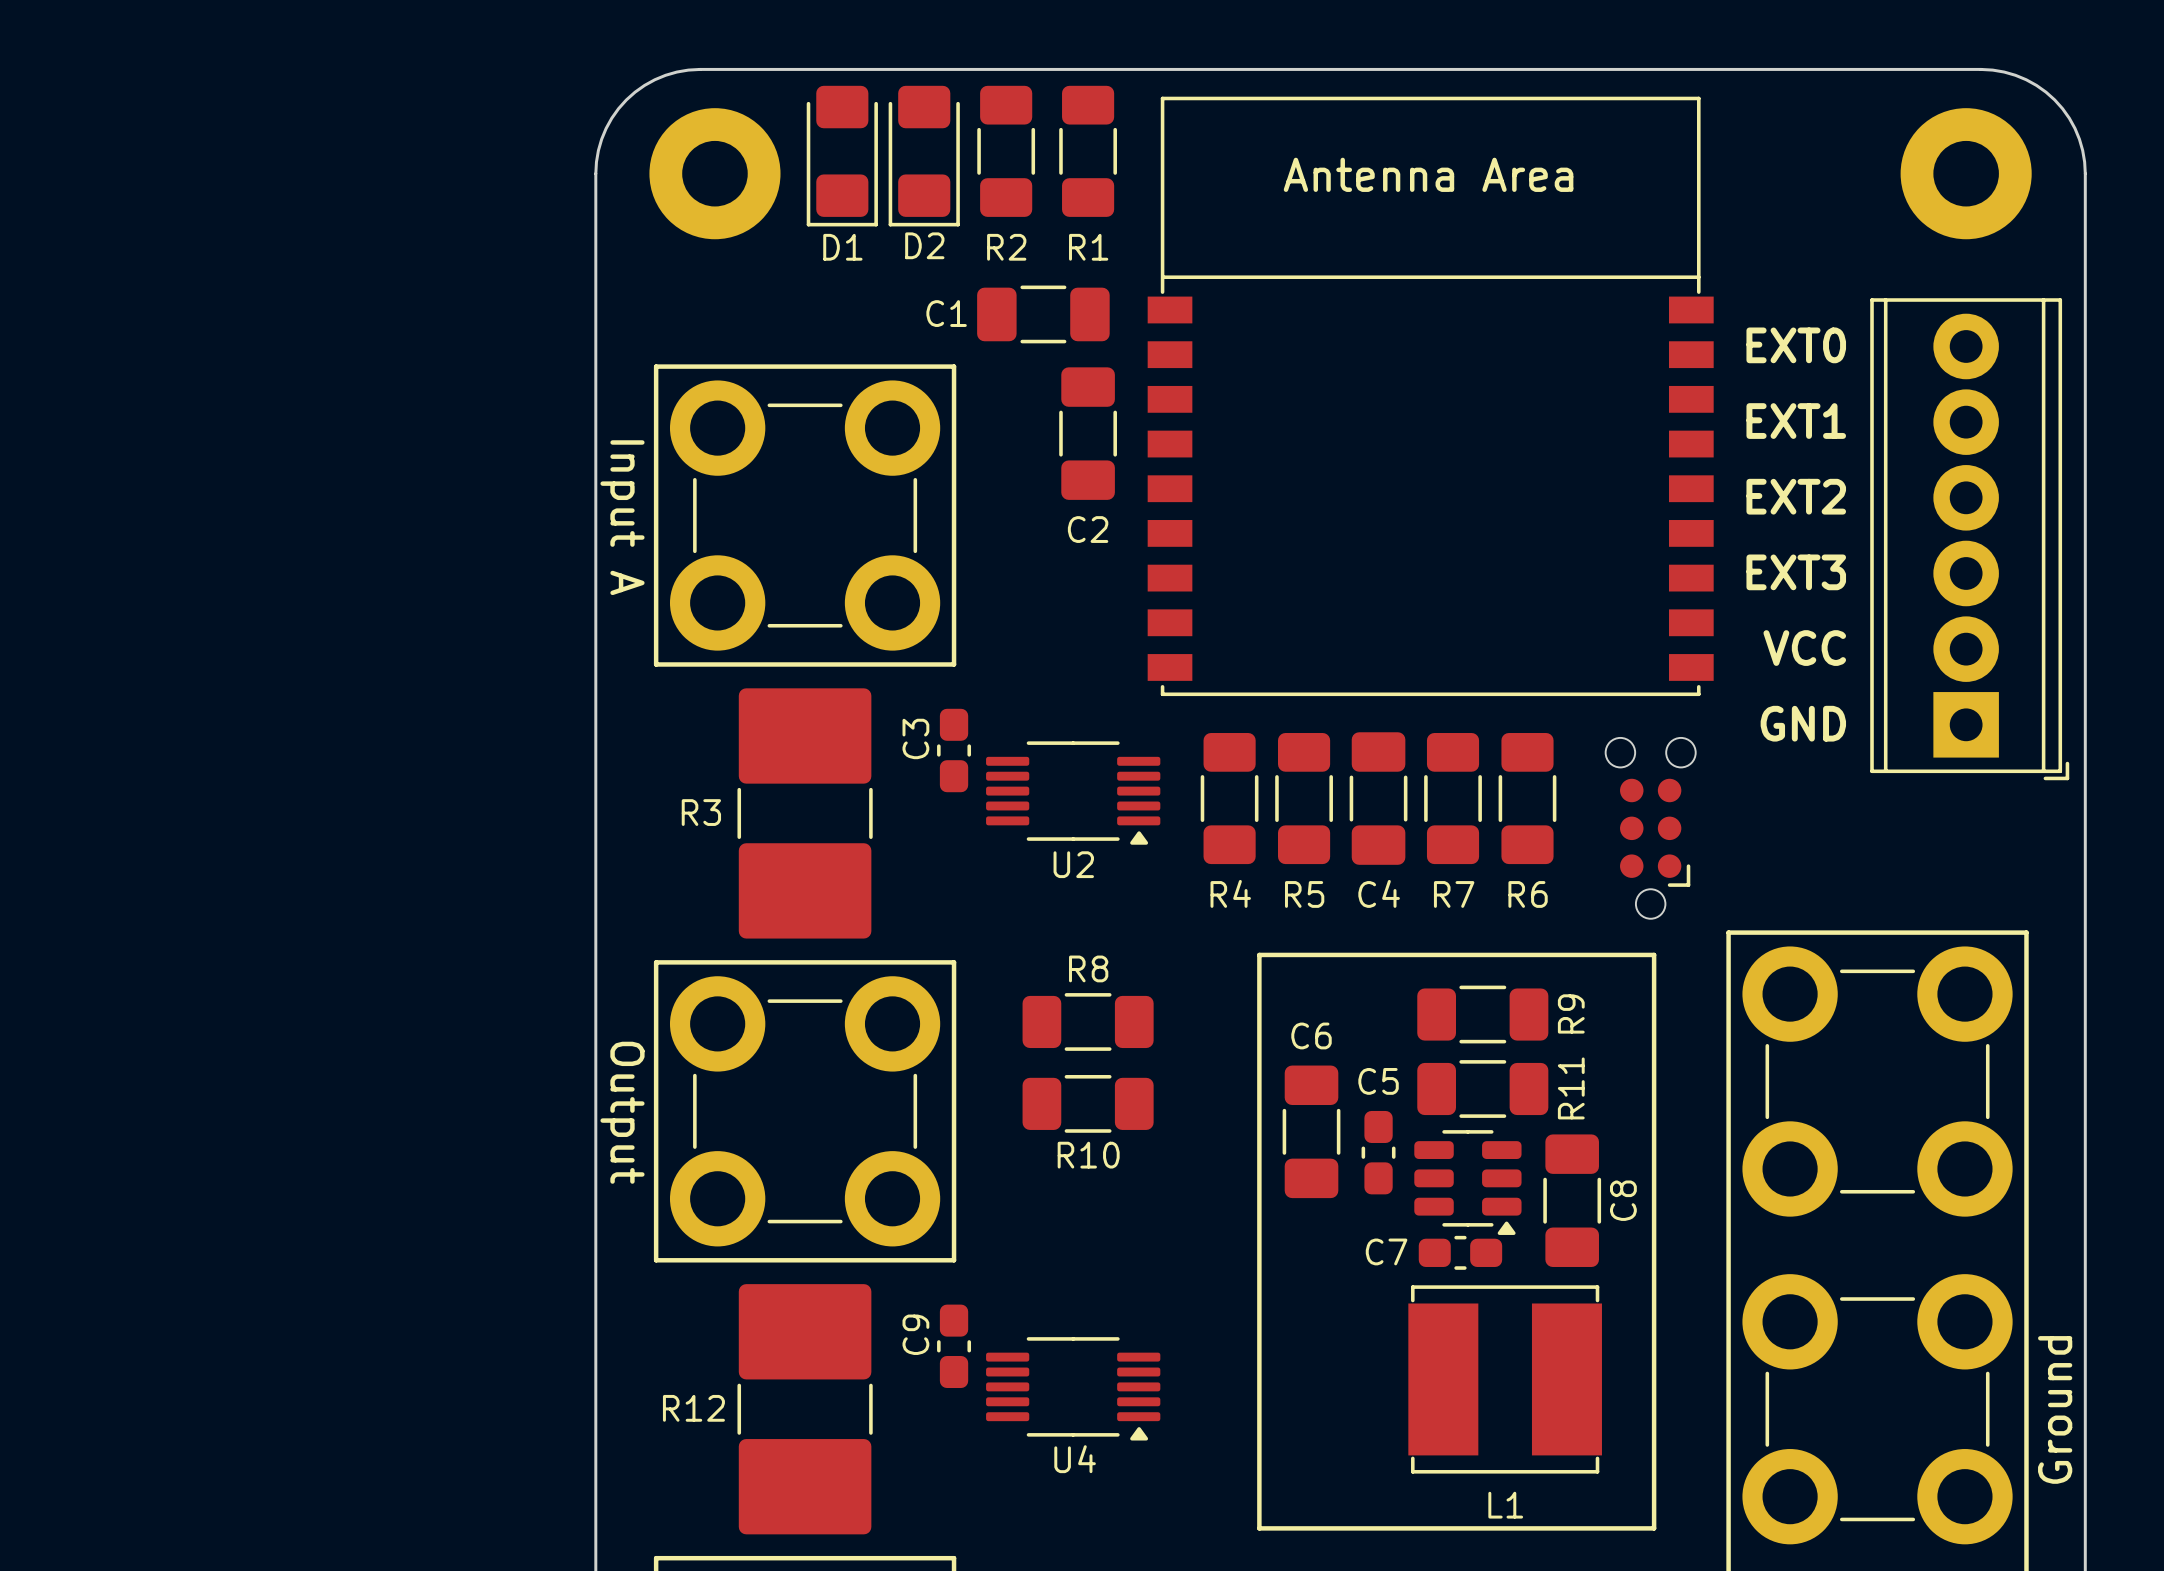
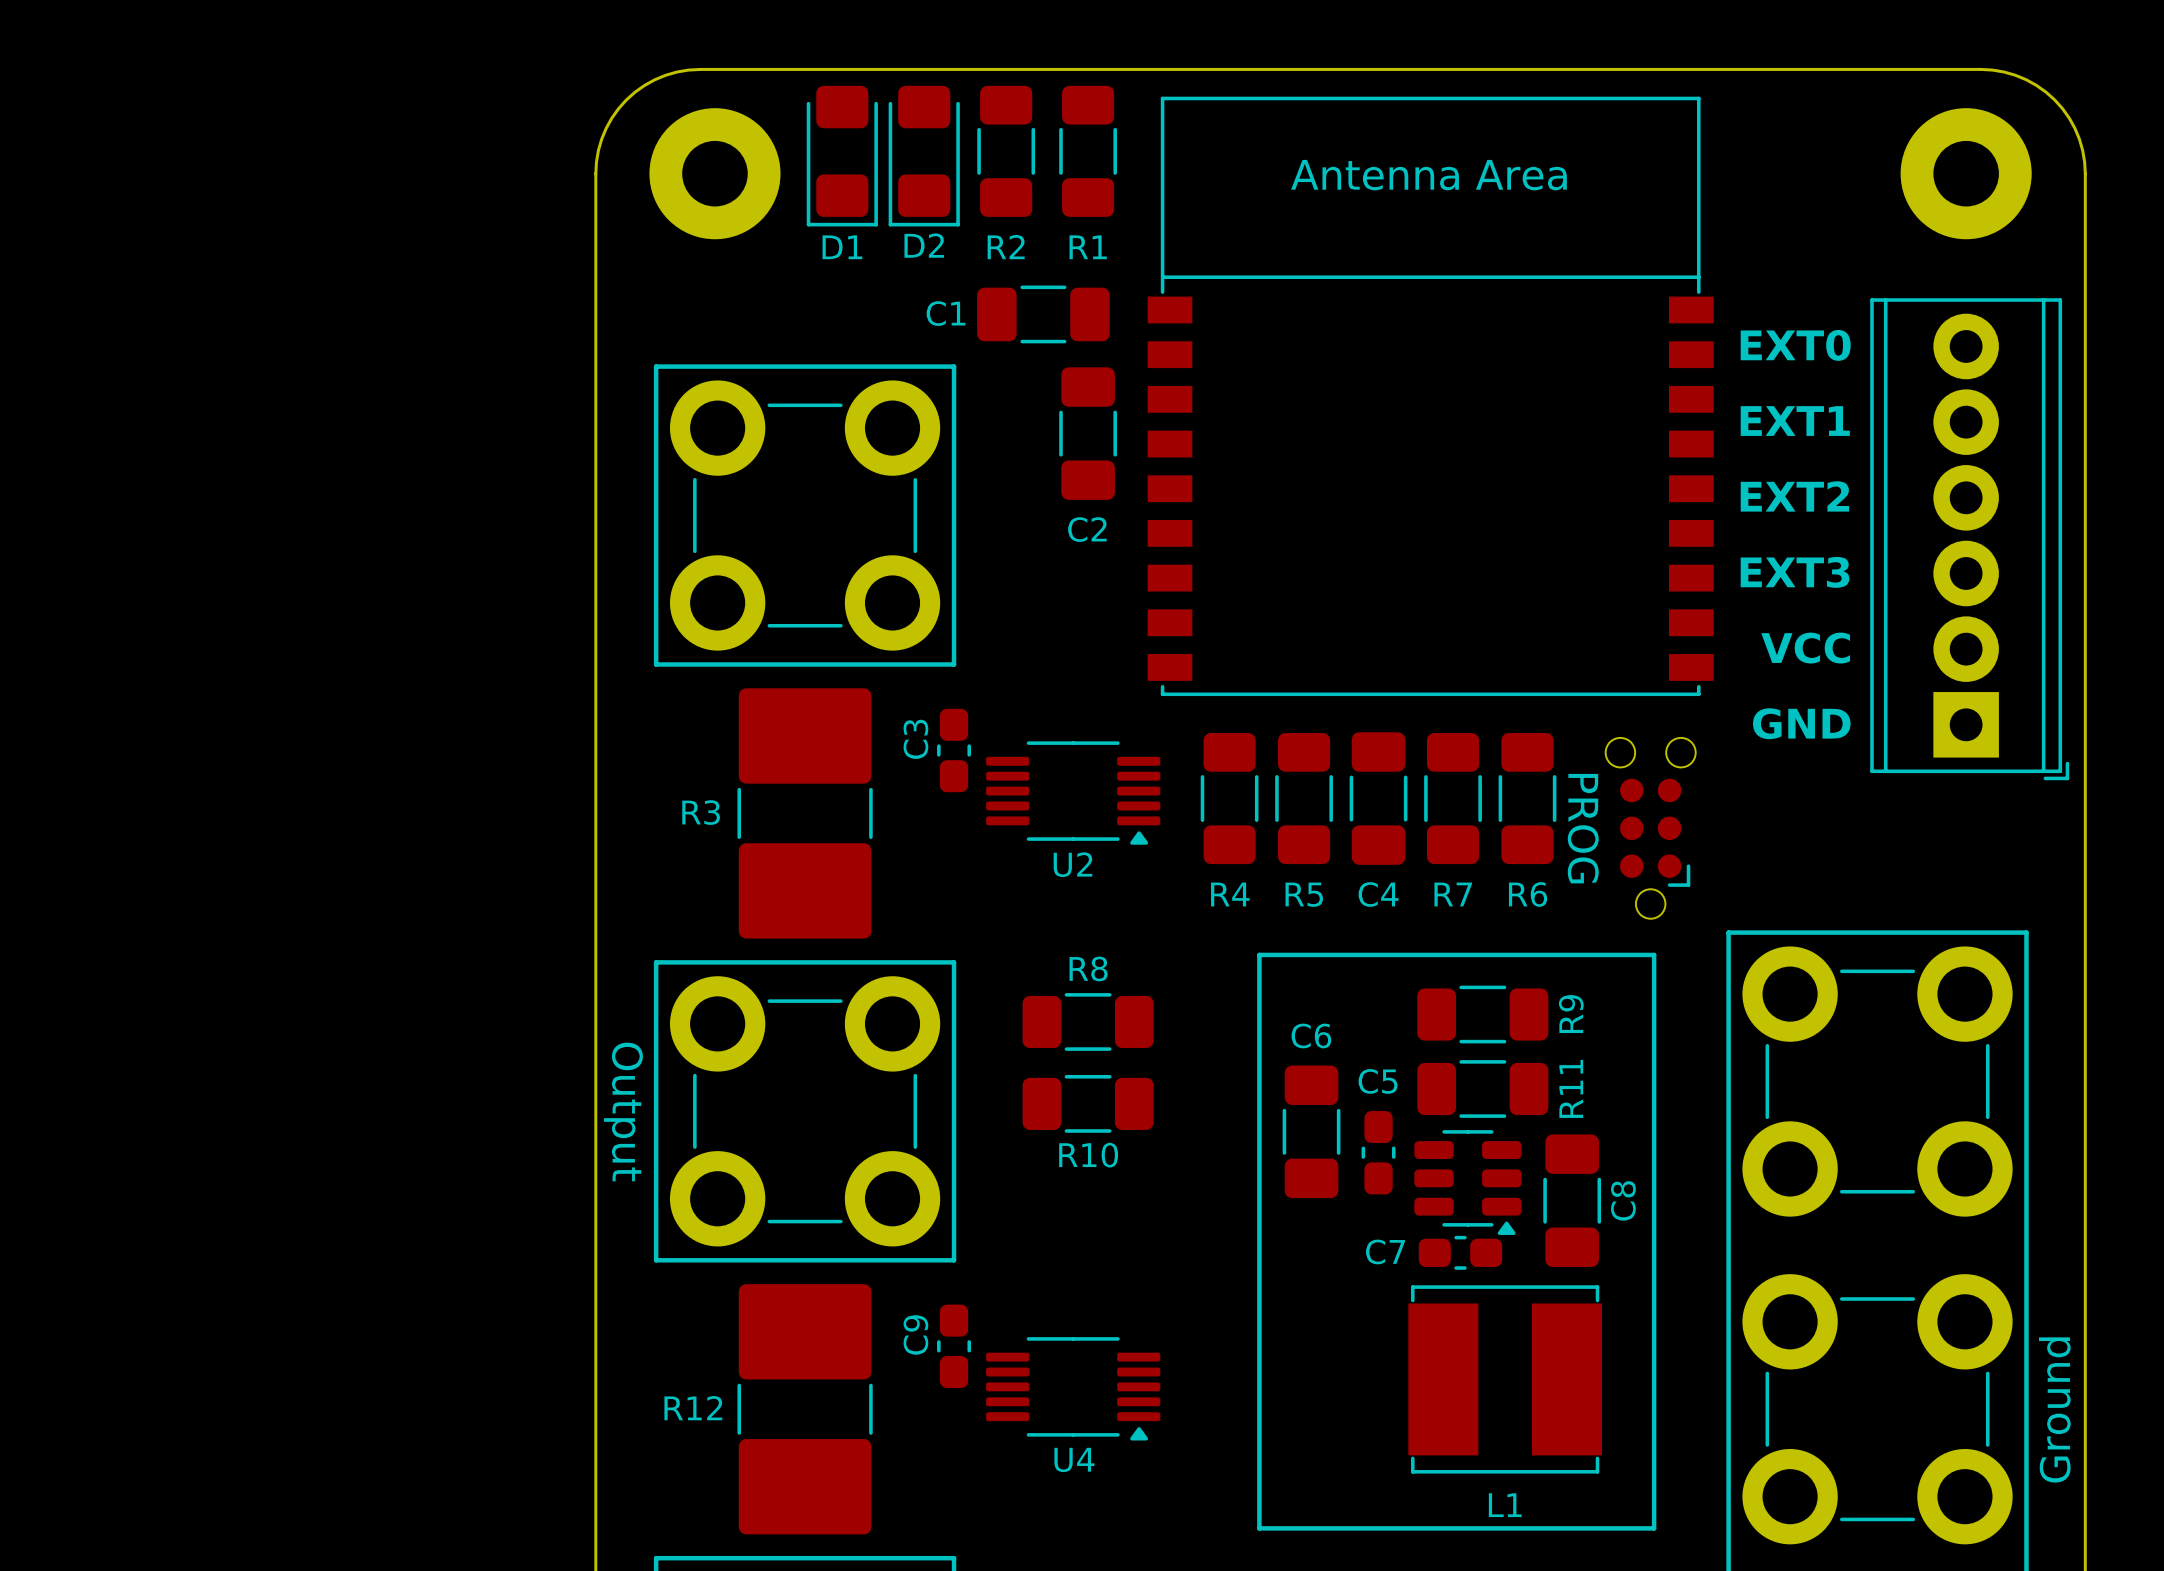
part value: Input A (622, 517) -> none
part text: none -> PROG (1583, 828)

